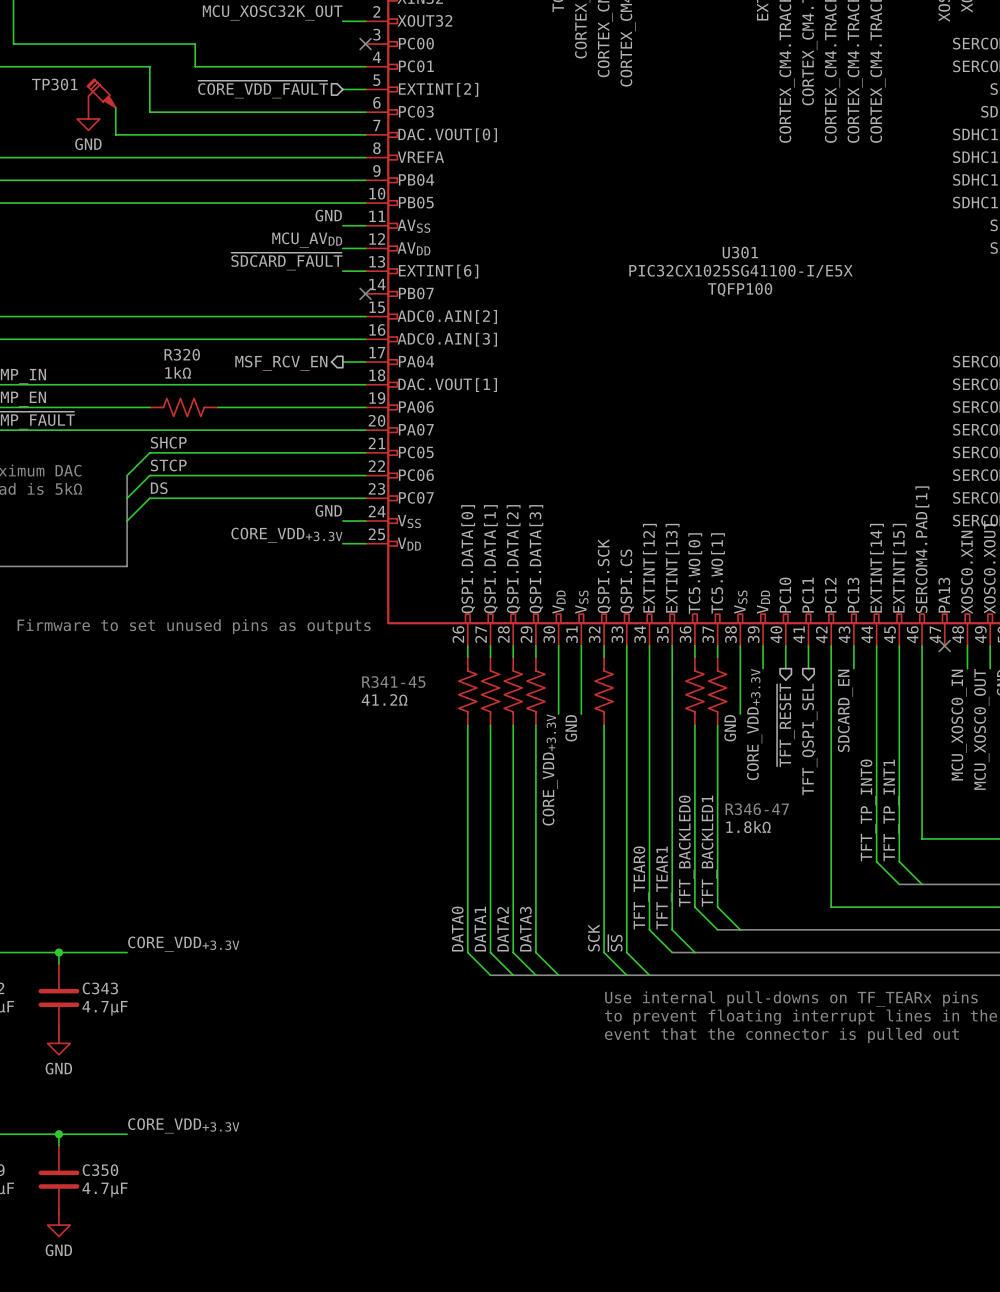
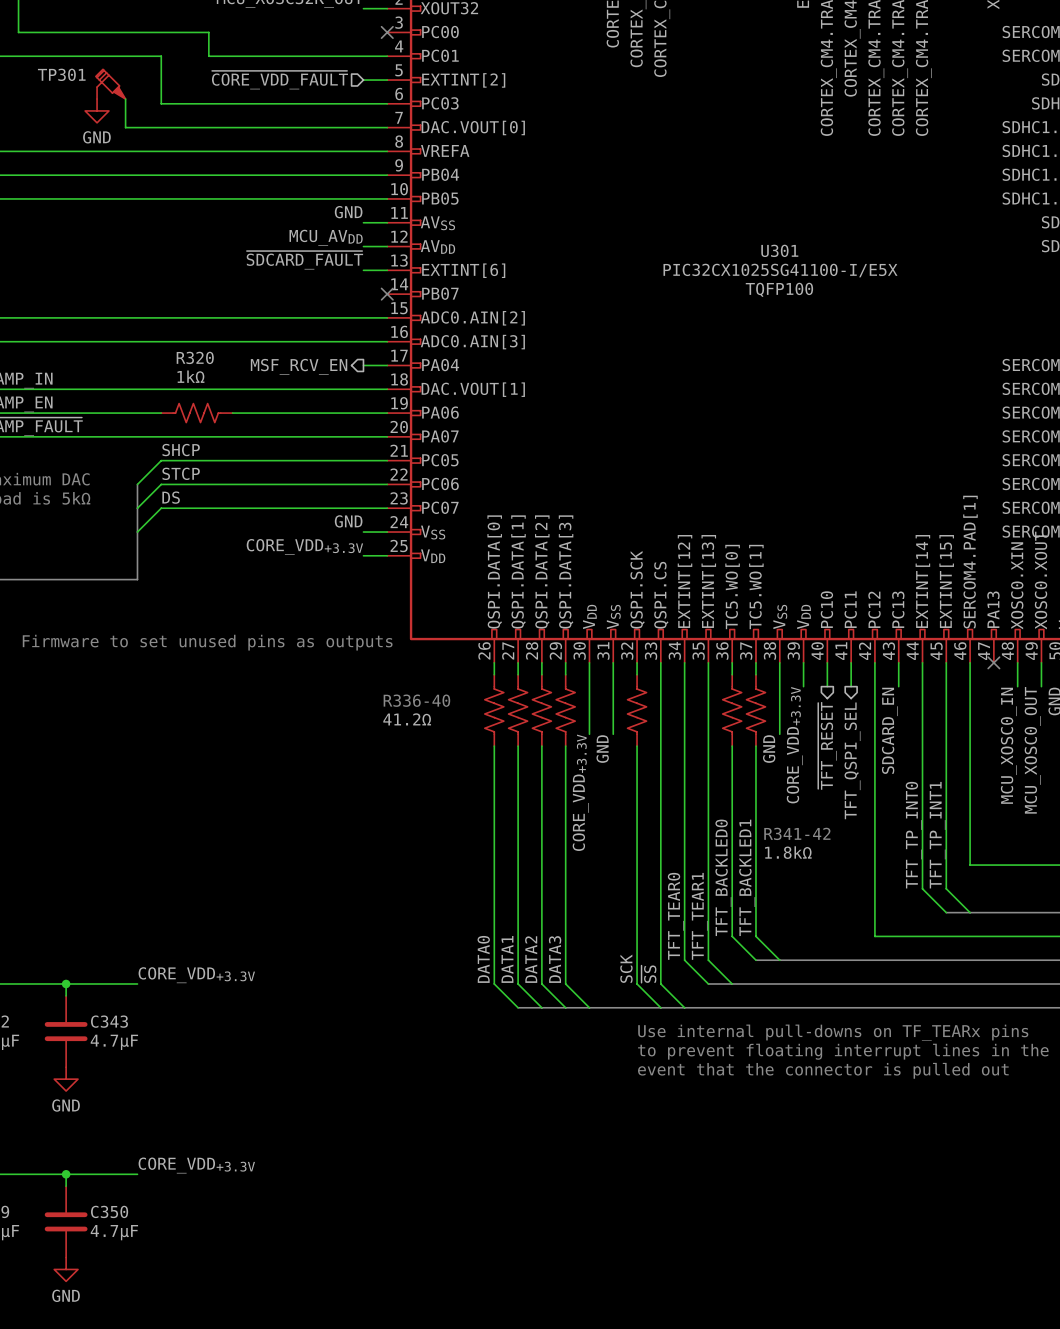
text: R341-45 (393, 682) -> R336-40 (416, 700)
text: R346-47 (757, 809) -> R341-42 (797, 833)

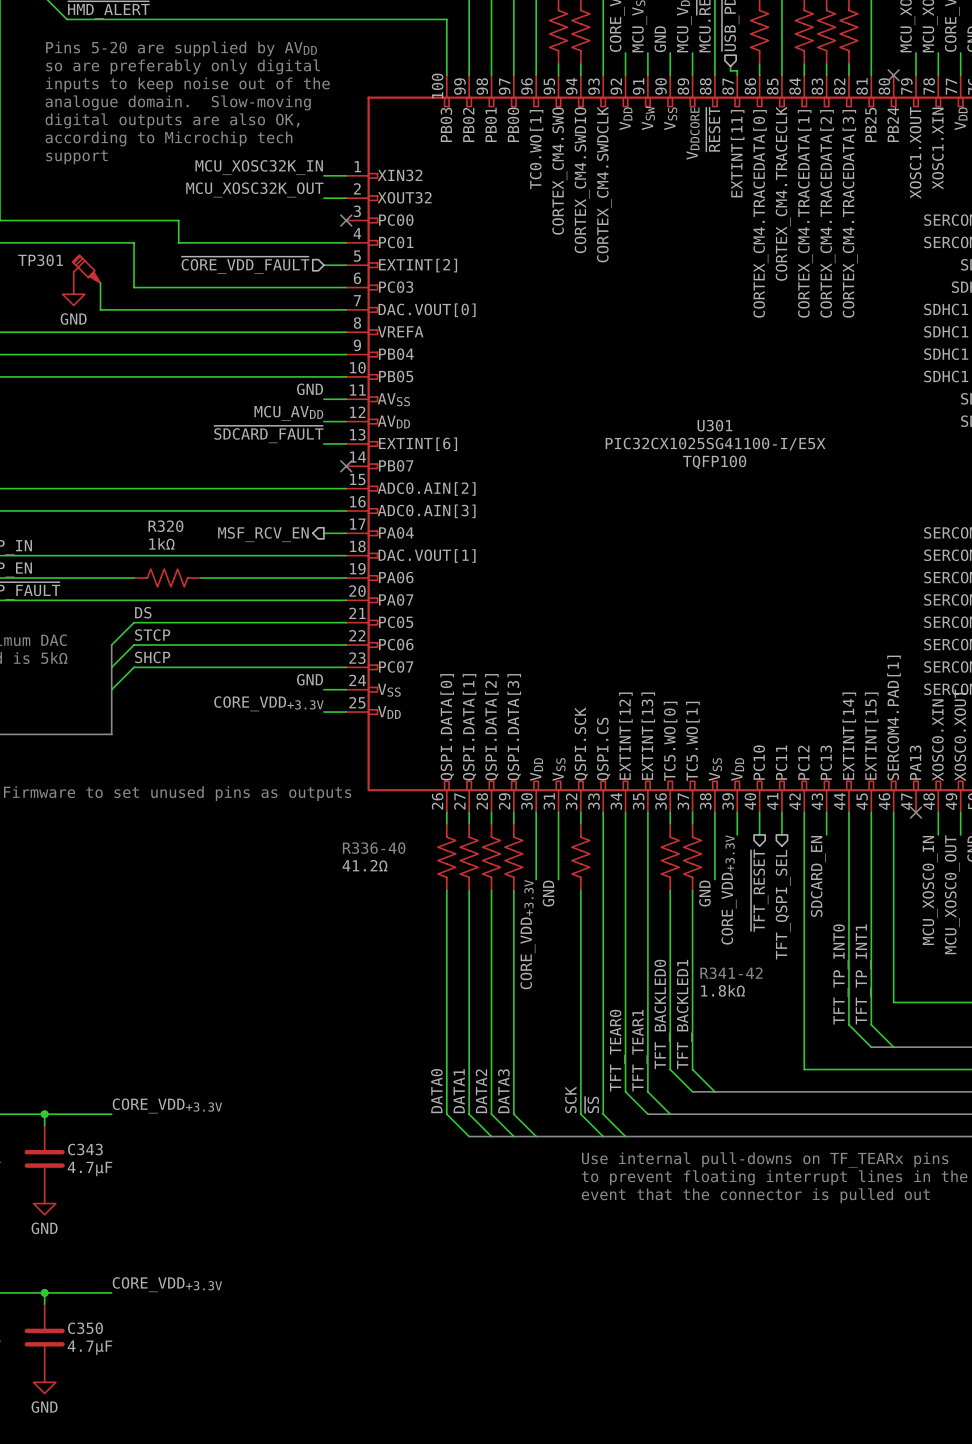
label: SHCP (181, 450) -> DS (143, 612)
label: DS (171, 497) -> SHCP (152, 657)

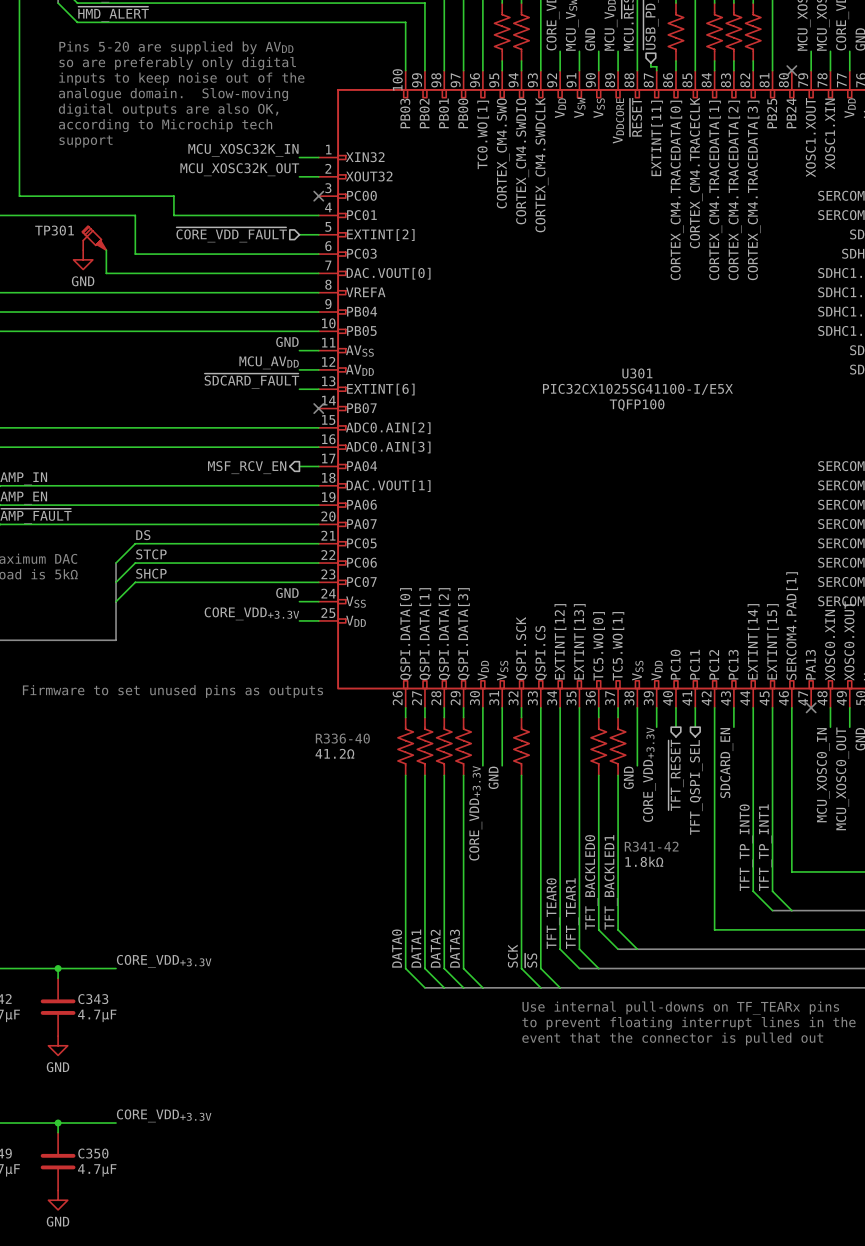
R320: 1kΩ (167, 577) -> none

